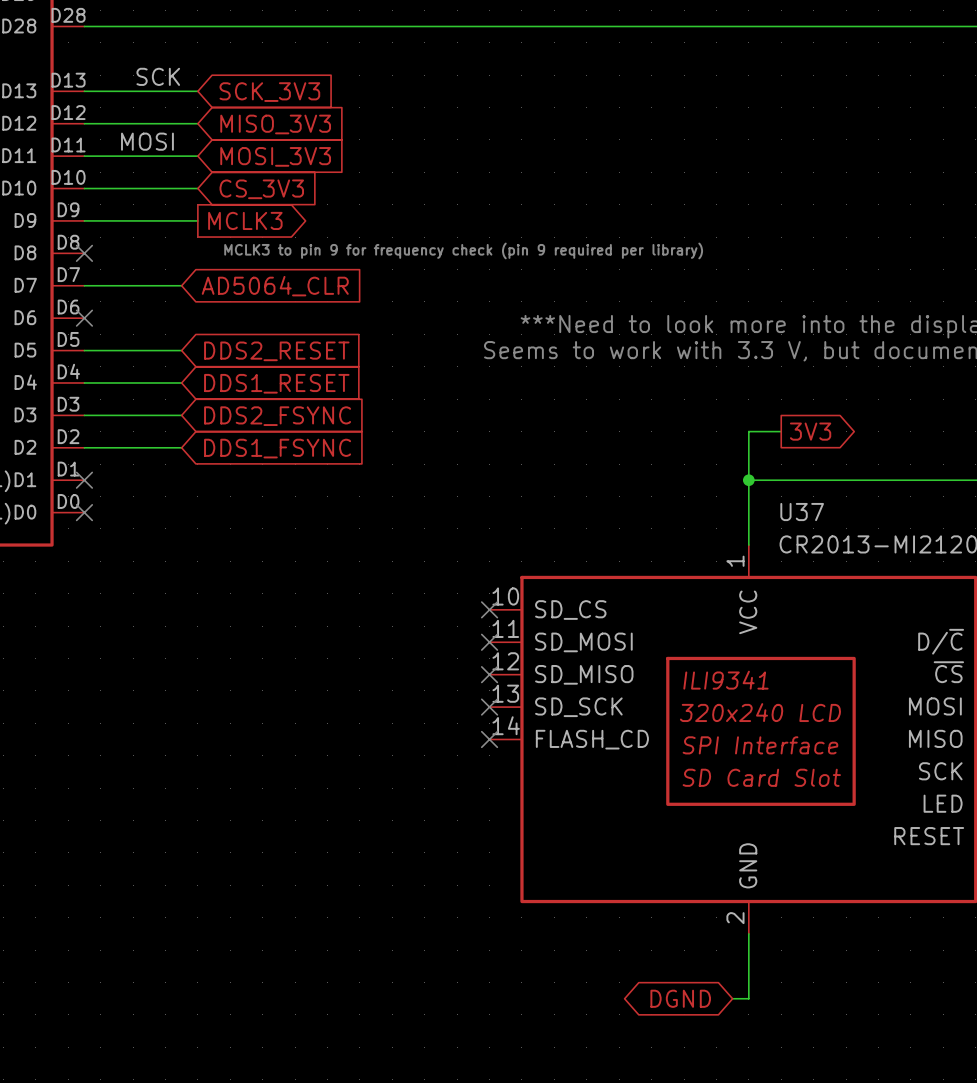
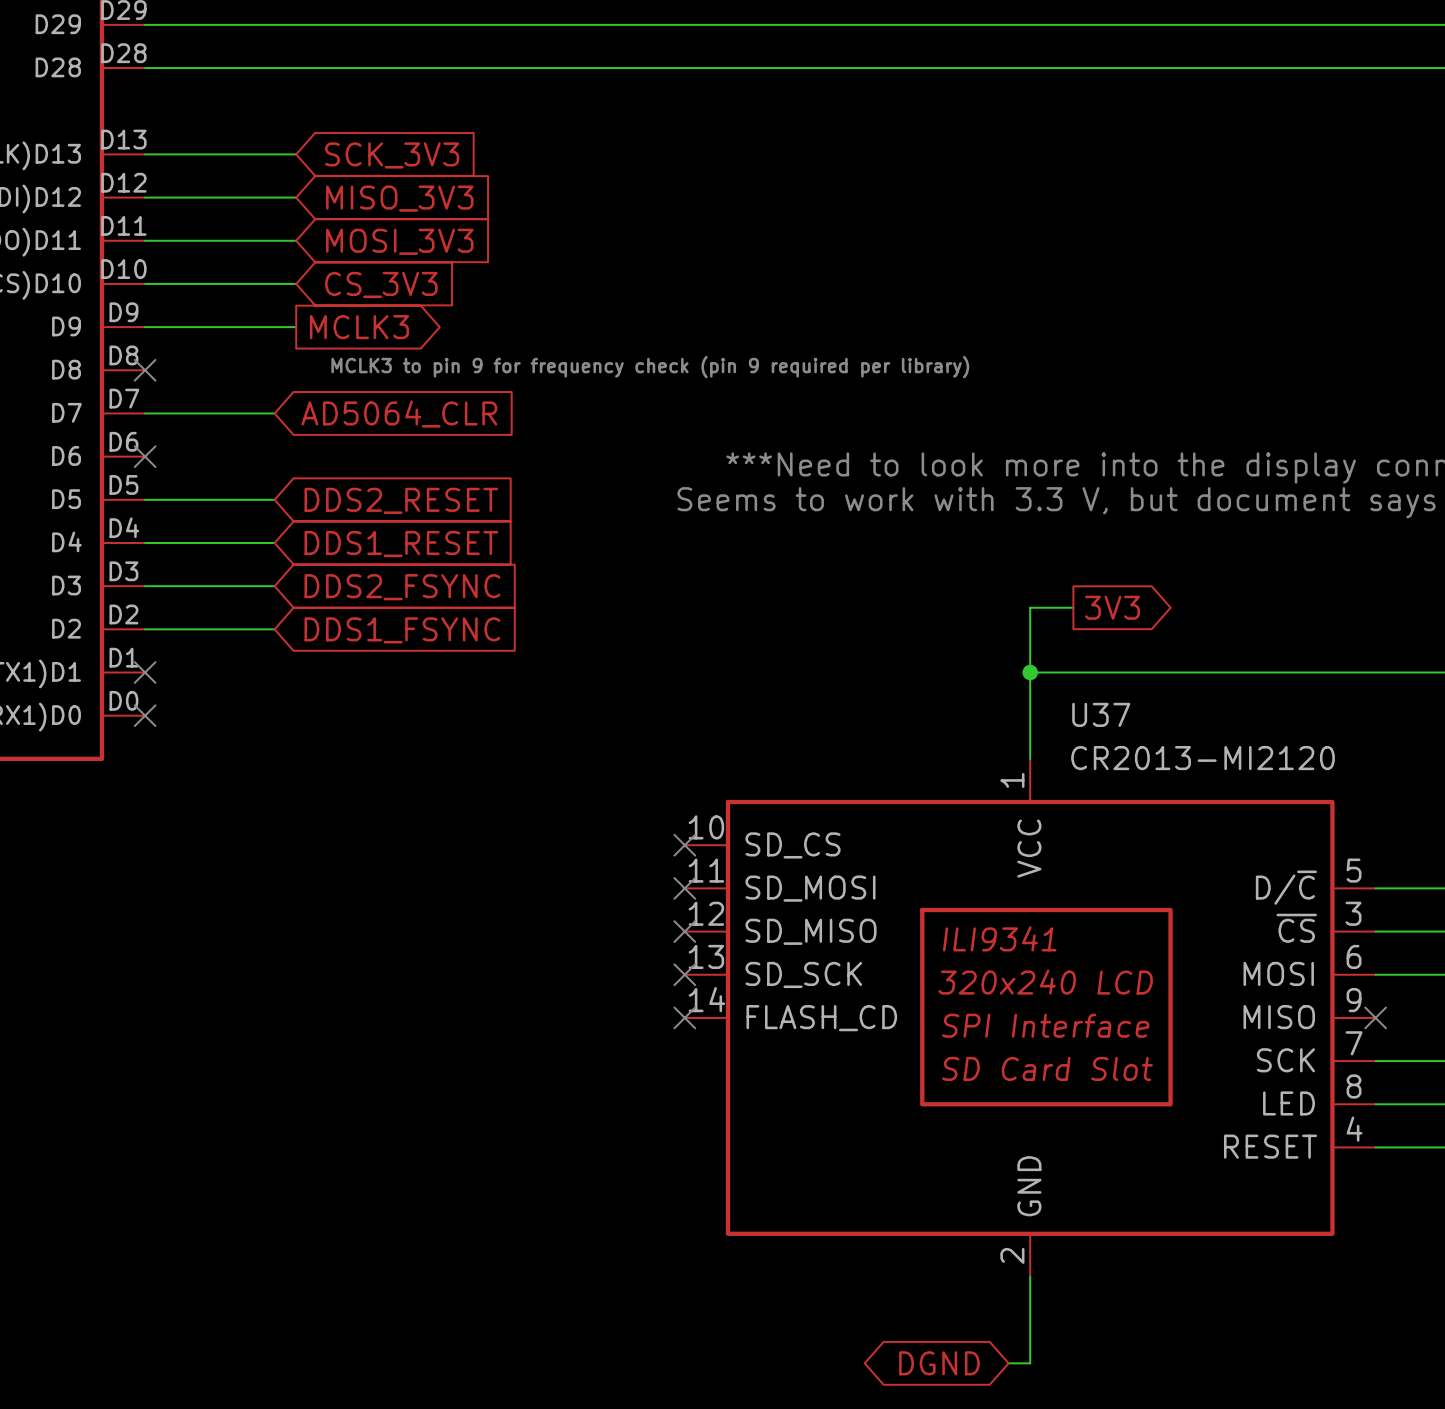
label: SCK (158, 76) -> none
label: MOSI (147, 141) -> none

